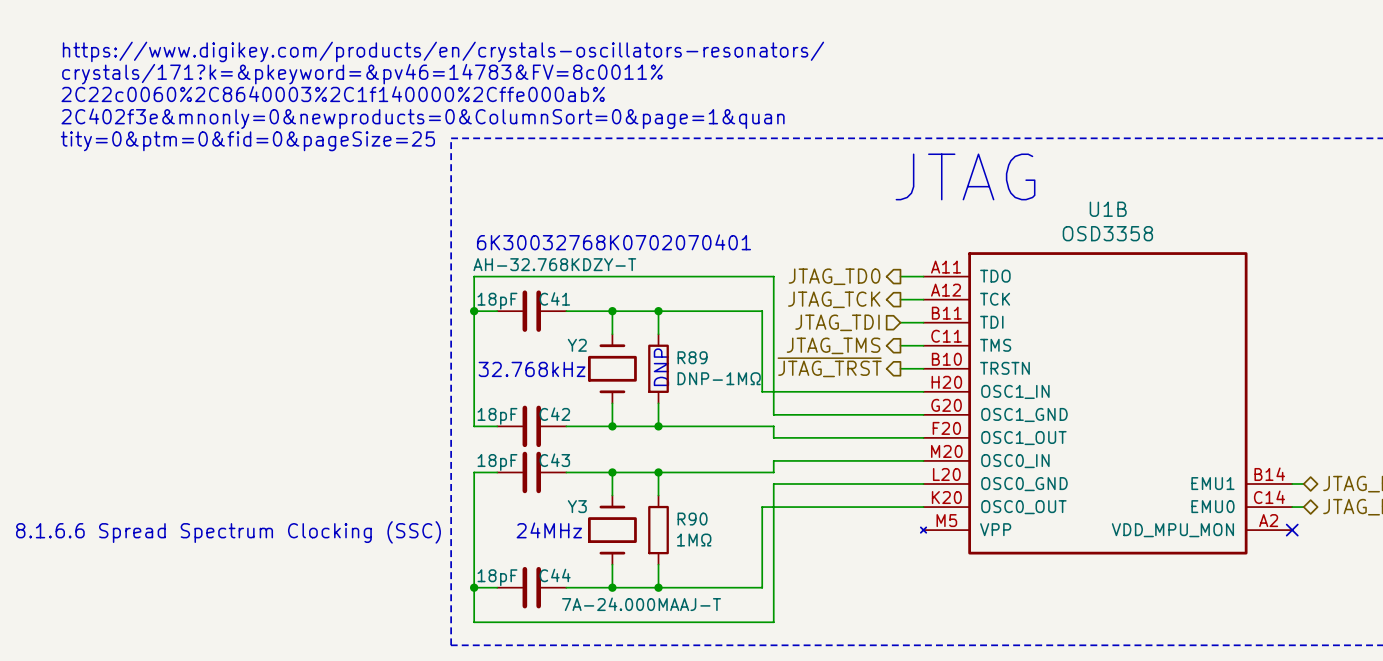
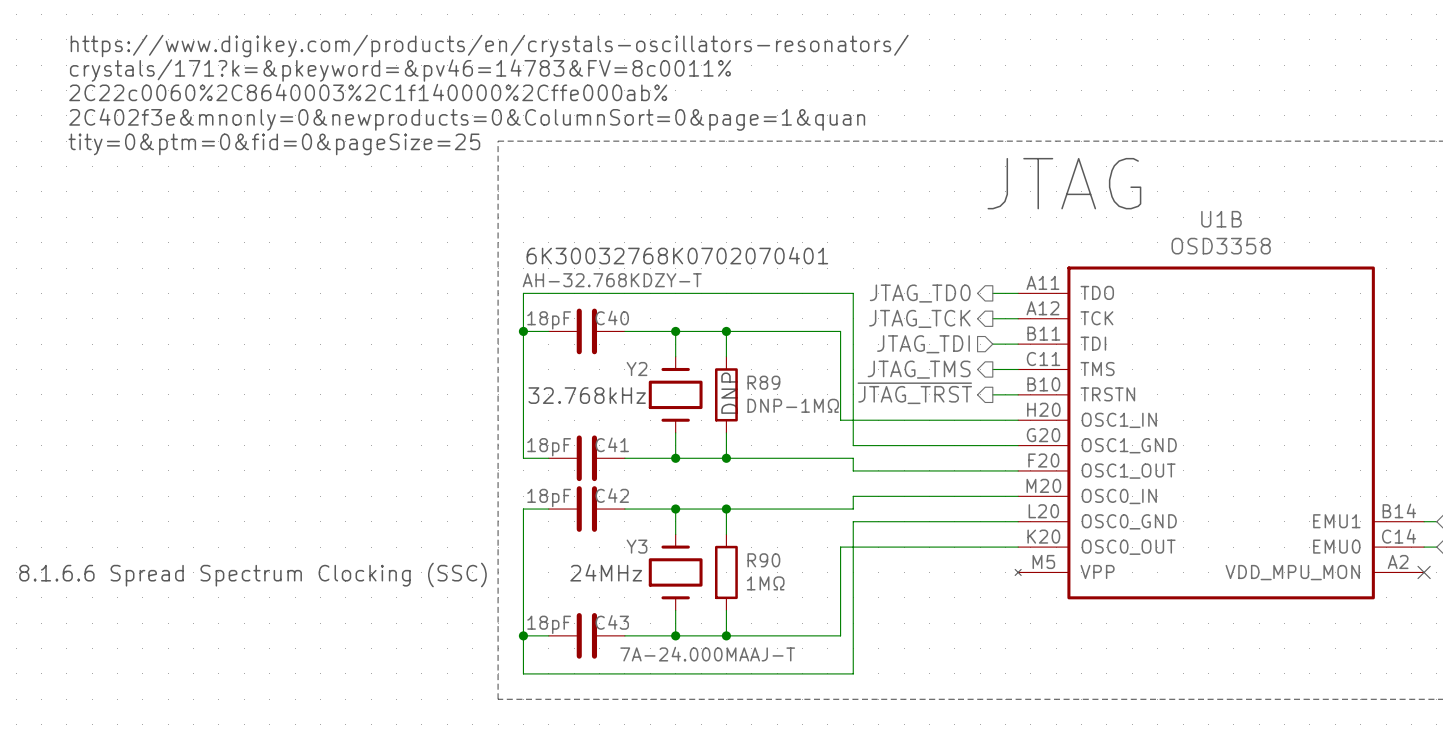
C41 name: C41 (554, 298) -> C40 (612, 317)
C42 name: C42 (554, 414) -> C41 (612, 444)
C43 name: C43 (554, 460) -> C42 (612, 495)
C44 name: C44 (555, 575) -> C43 (612, 622)

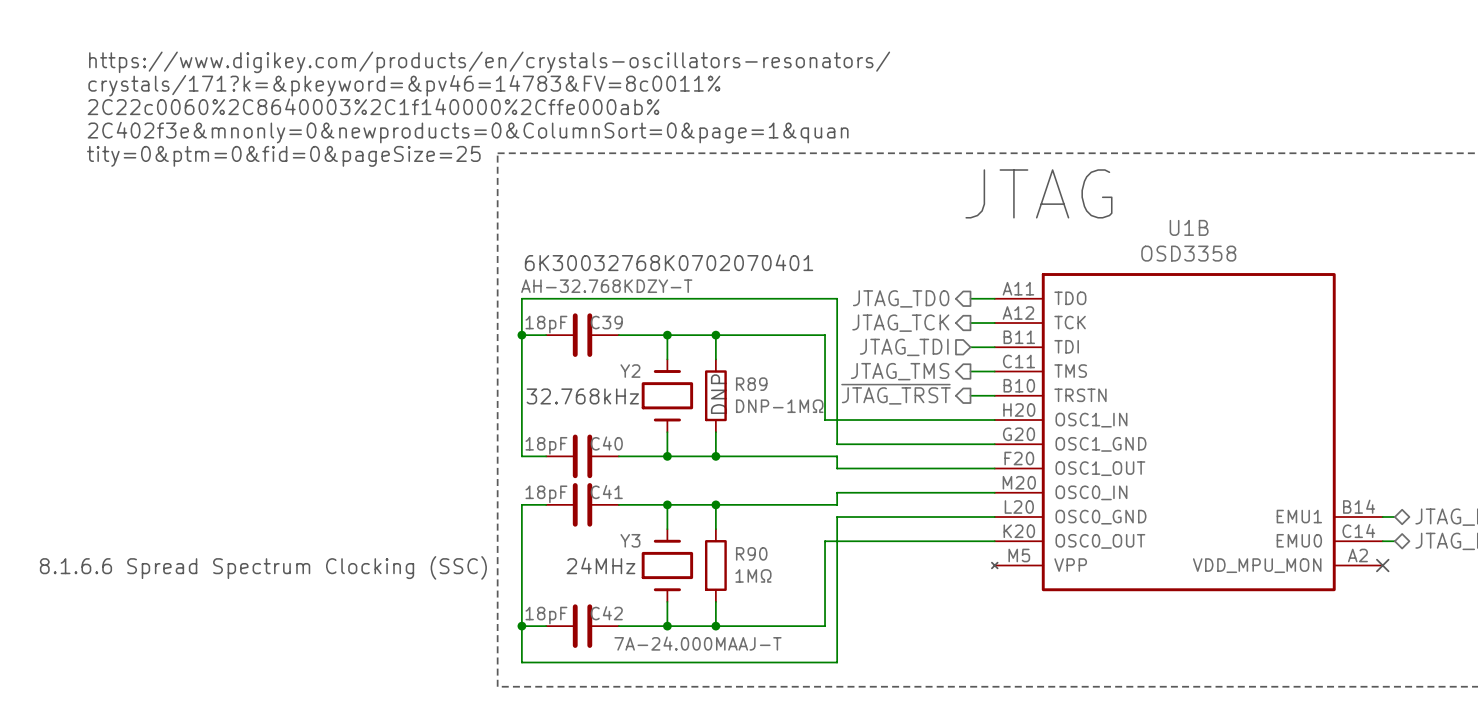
C40 name: C40 (612, 317) -> C39 (606, 322)
C41 name: C41 (612, 444) -> C40 (606, 443)
C42 name: C42 (612, 495) -> C41 (606, 492)
C43 name: C43 (612, 622) -> C42 (606, 613)

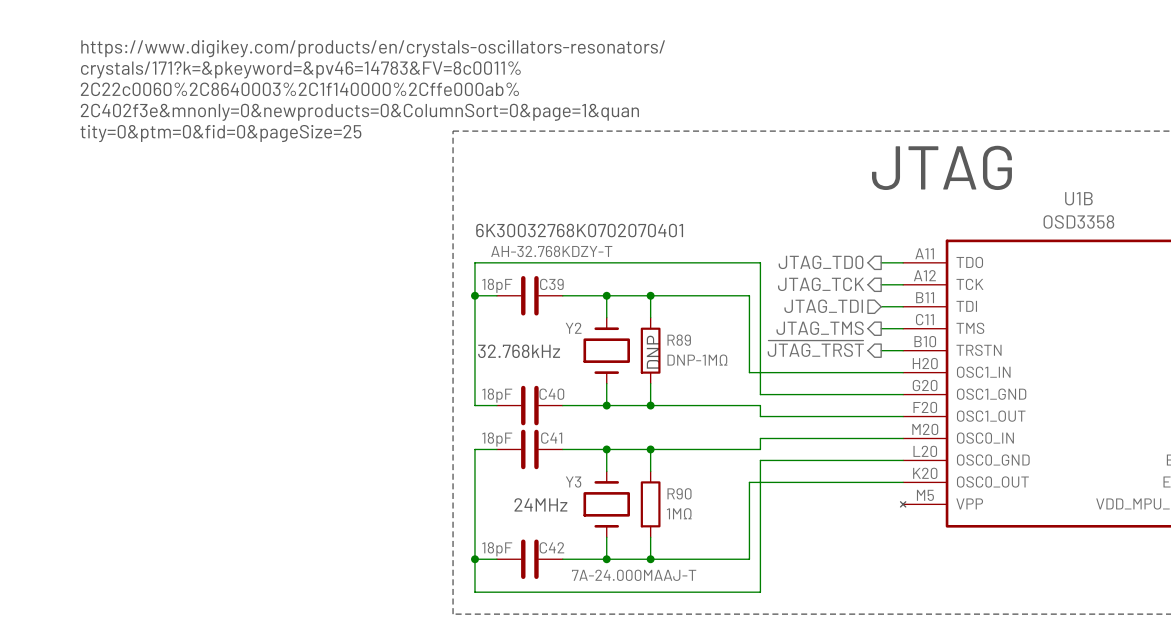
text: 8.1.6.6 Spread Spectrum Clocking (SSC) (263, 567) -> none

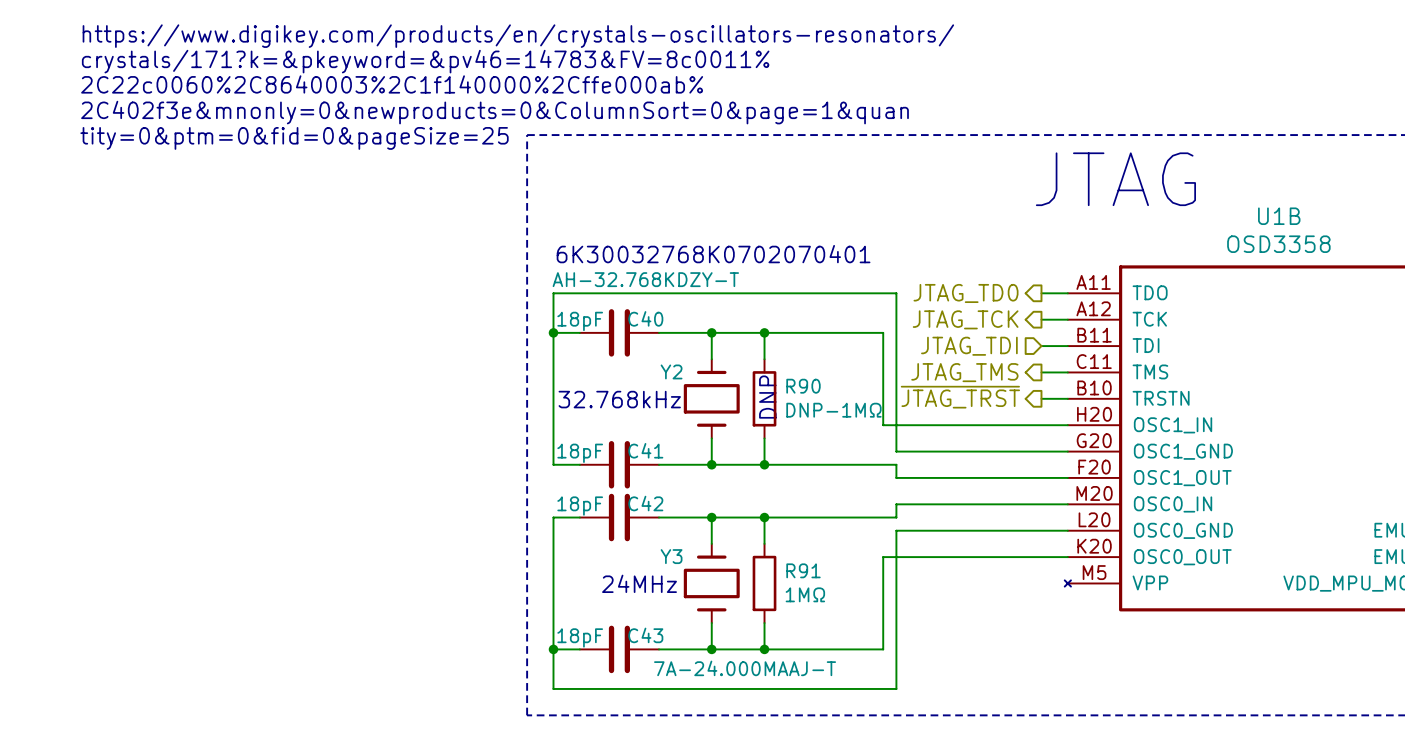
C39 name: C39 (551, 284) -> C40 (645, 318)
R89 name: R89 (679, 340) -> R90 (803, 386)
C40 name: C40 (551, 394) -> C41 (645, 450)
C41 name: C41 (551, 438) -> C42 (645, 503)
R90 name: R90 (679, 493) -> R91 (803, 570)
C42 name: C42 (551, 547) -> C43 (645, 635)

